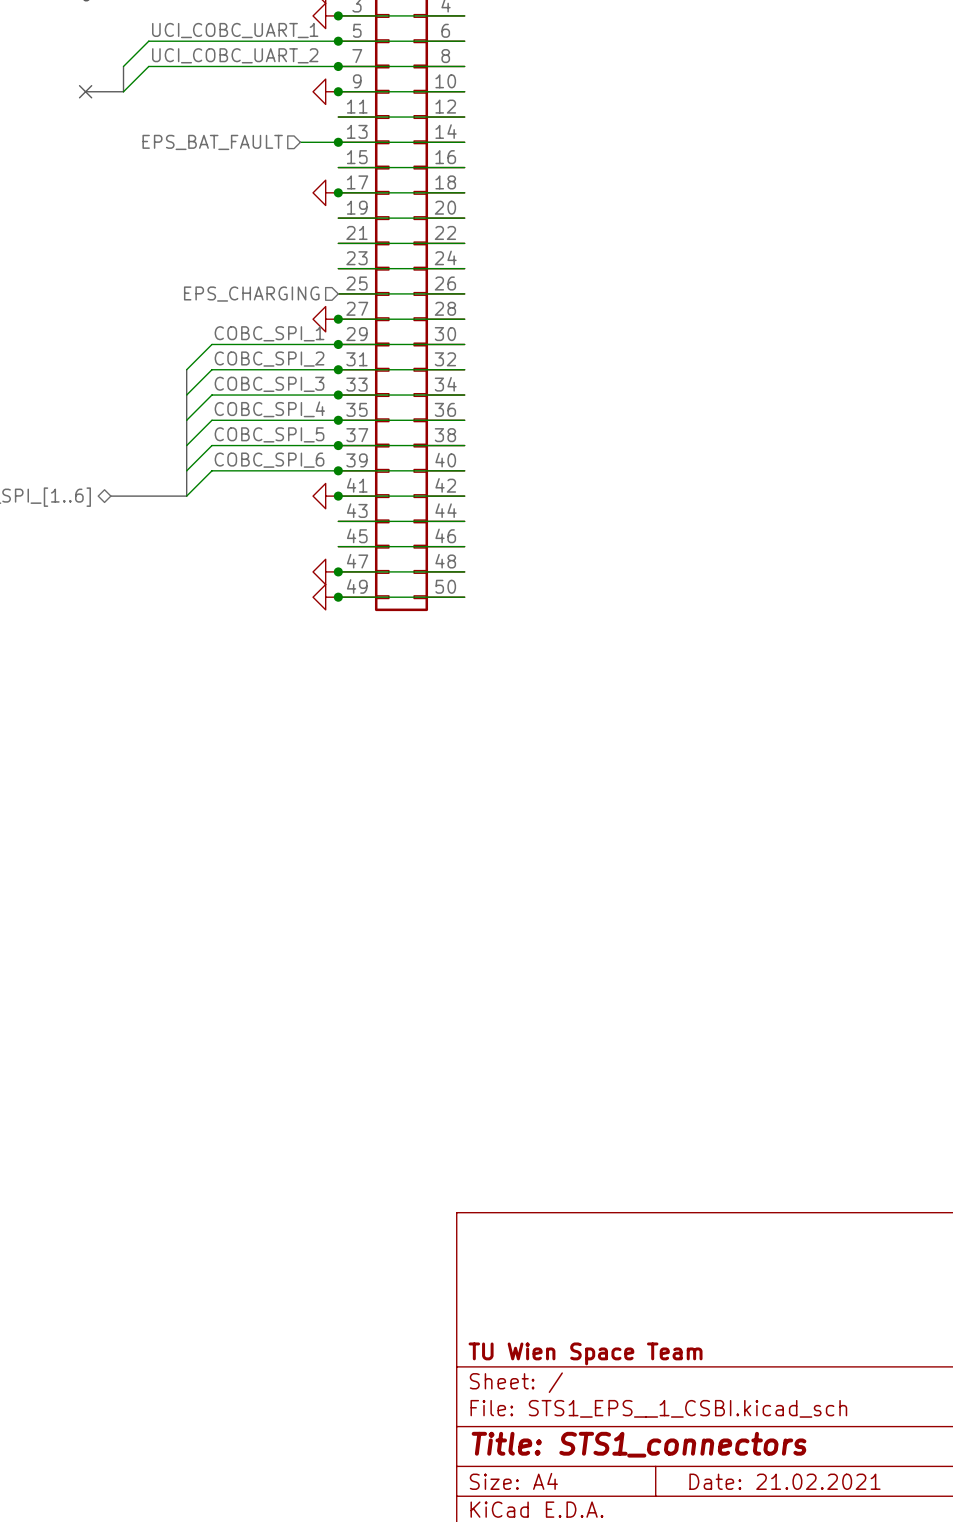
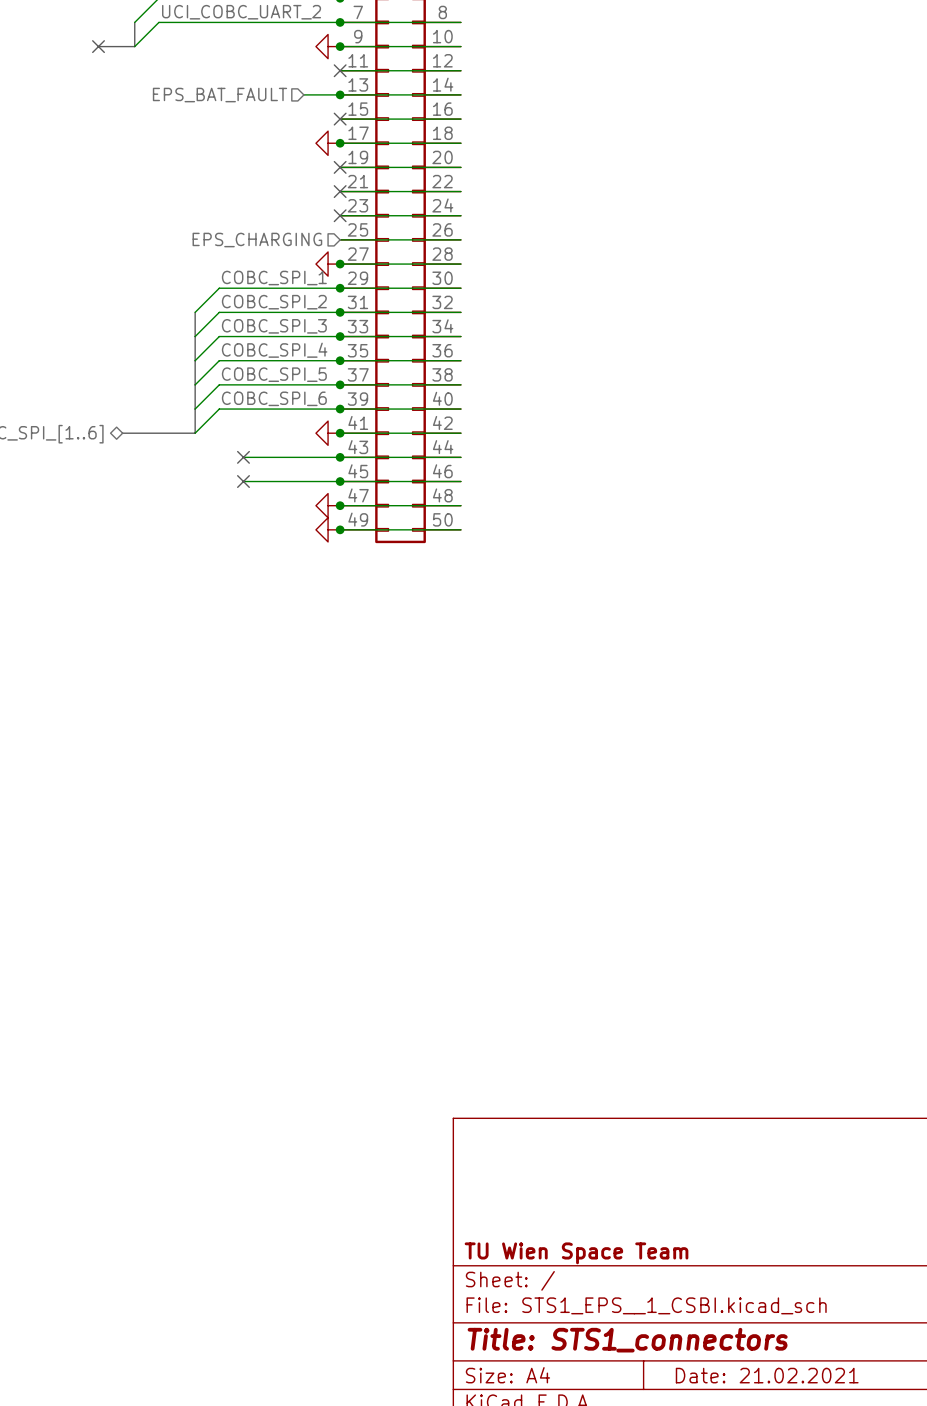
no-connect mark: none -> (340, 70)
no-connect mark: none -> (340, 119)
no-connect mark: none -> (340, 167)
no-connect mark: none -> (340, 191)
no-connect mark: none -> (340, 215)
wire: none -> (243, 457) (340, 457)
no-connect mark: none -> (243, 457)
junction: none -> (340, 457)
wire: none -> (243, 481) (340, 481)
no-connect mark: none -> (243, 481)
junction: none -> (340, 481)

